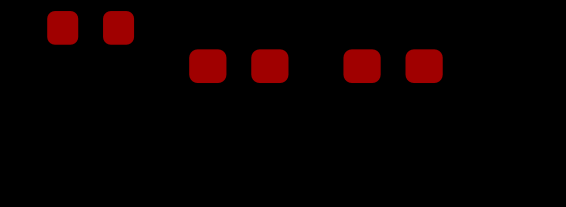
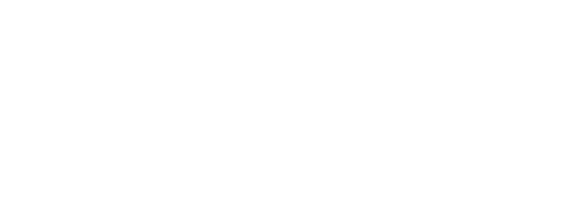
part: (90, 27) -> none
part: (238, 66) -> none
part: (393, 66) -> none

